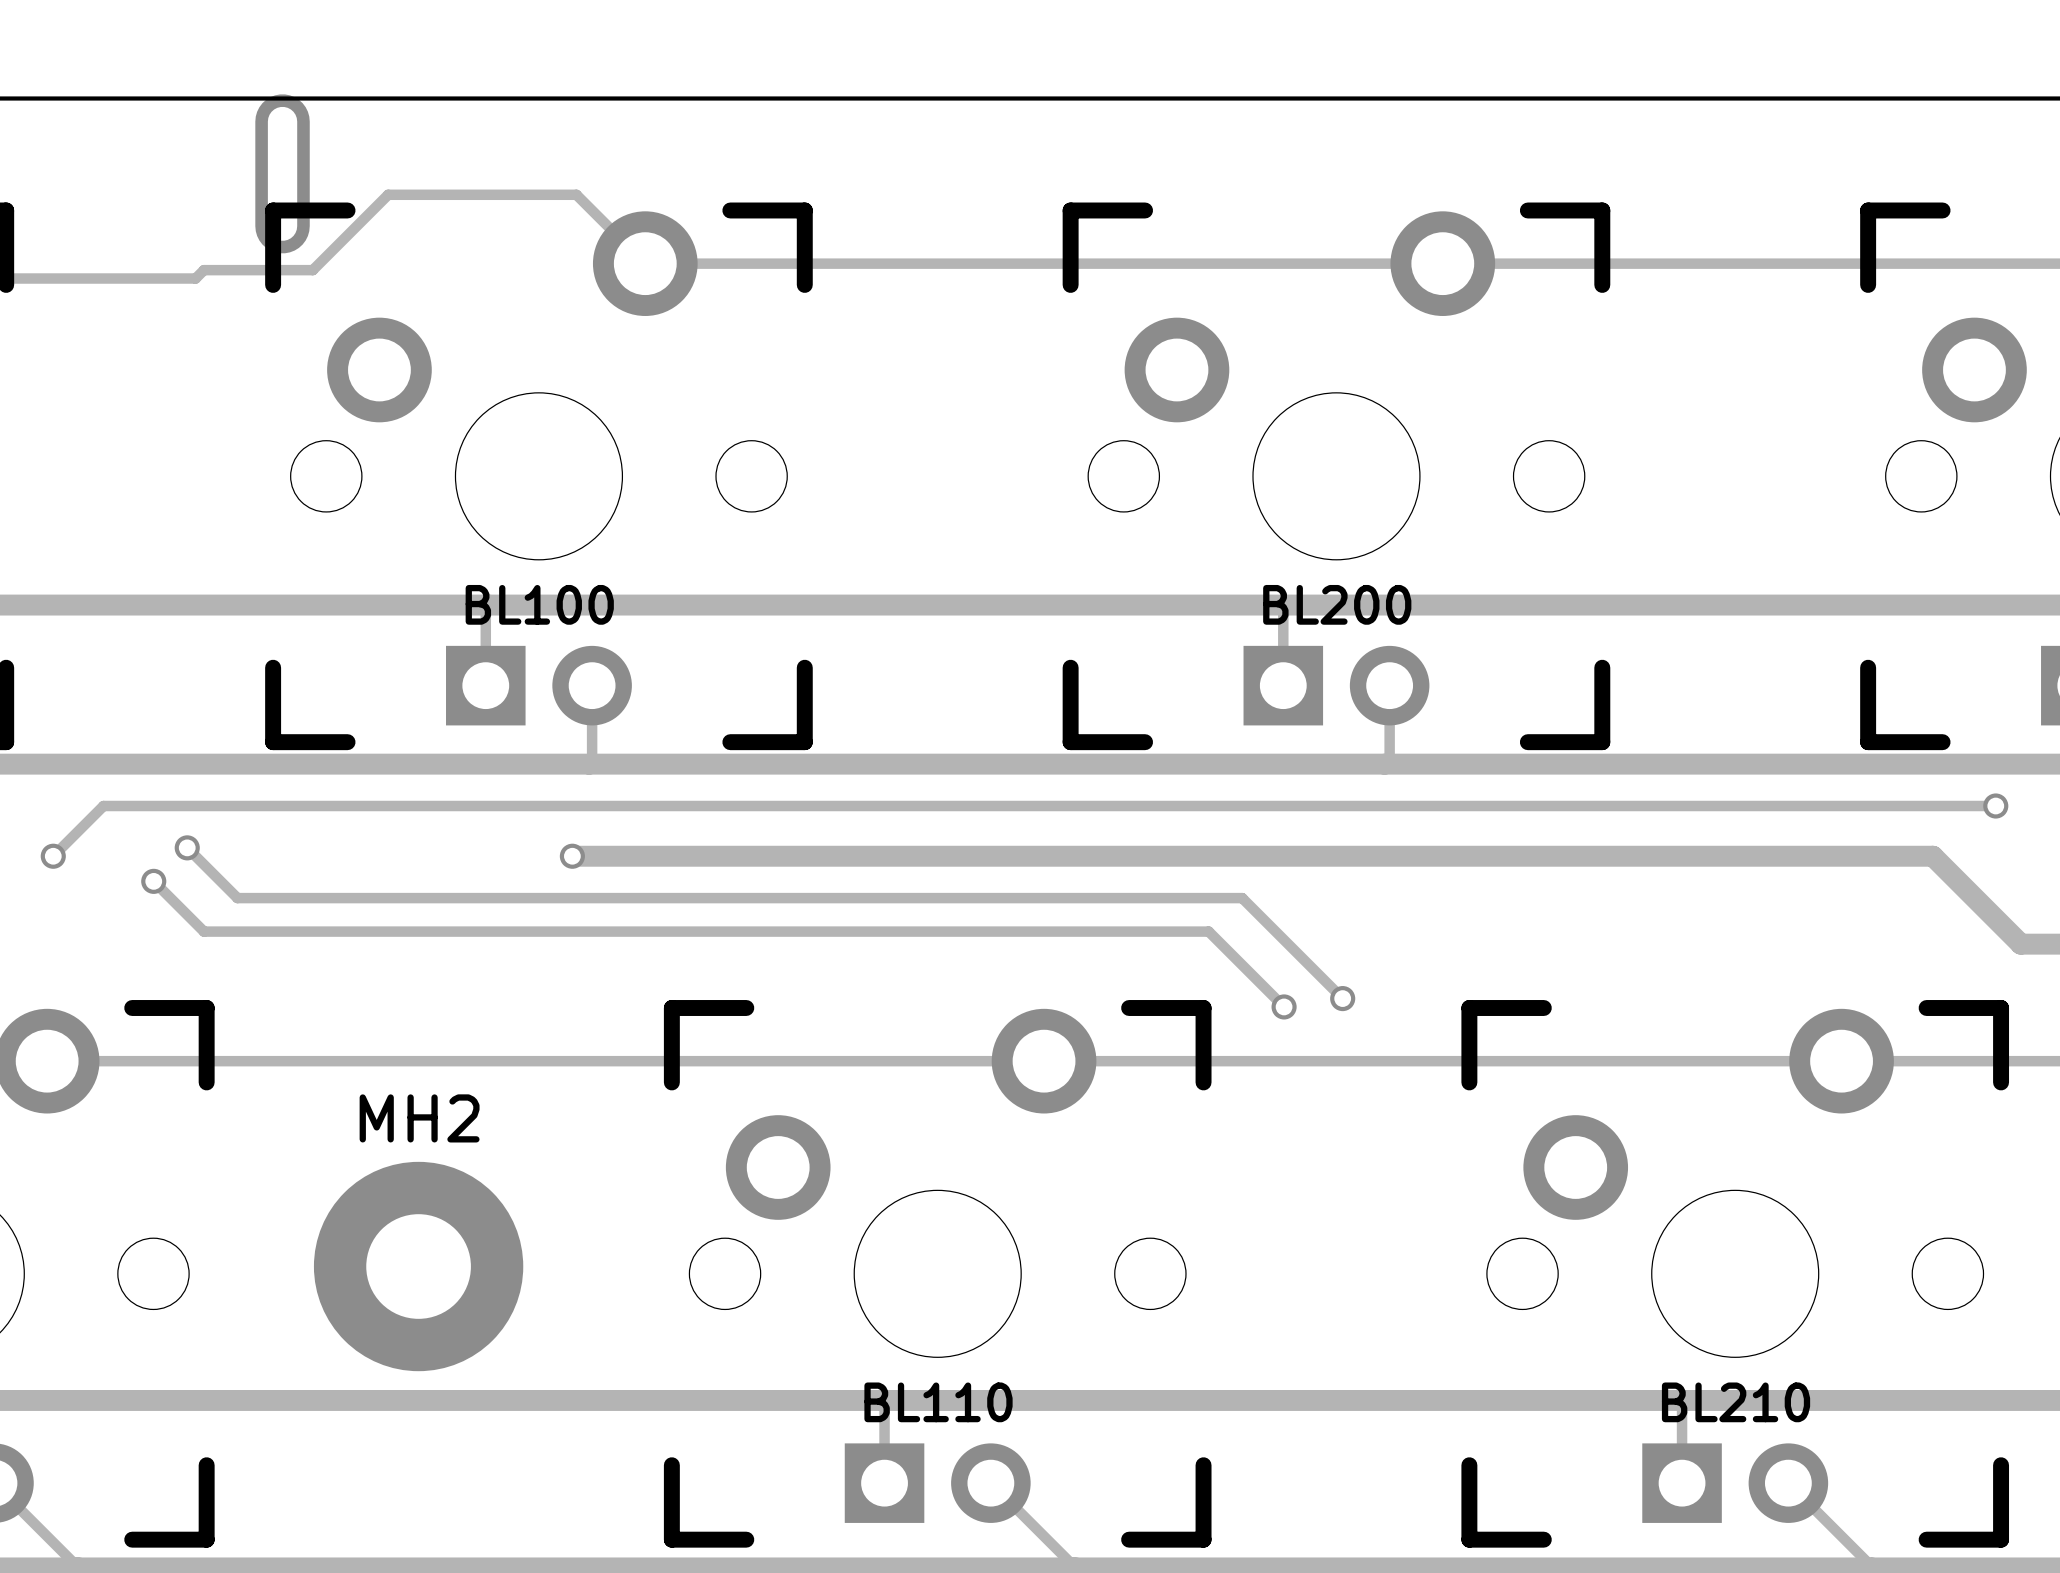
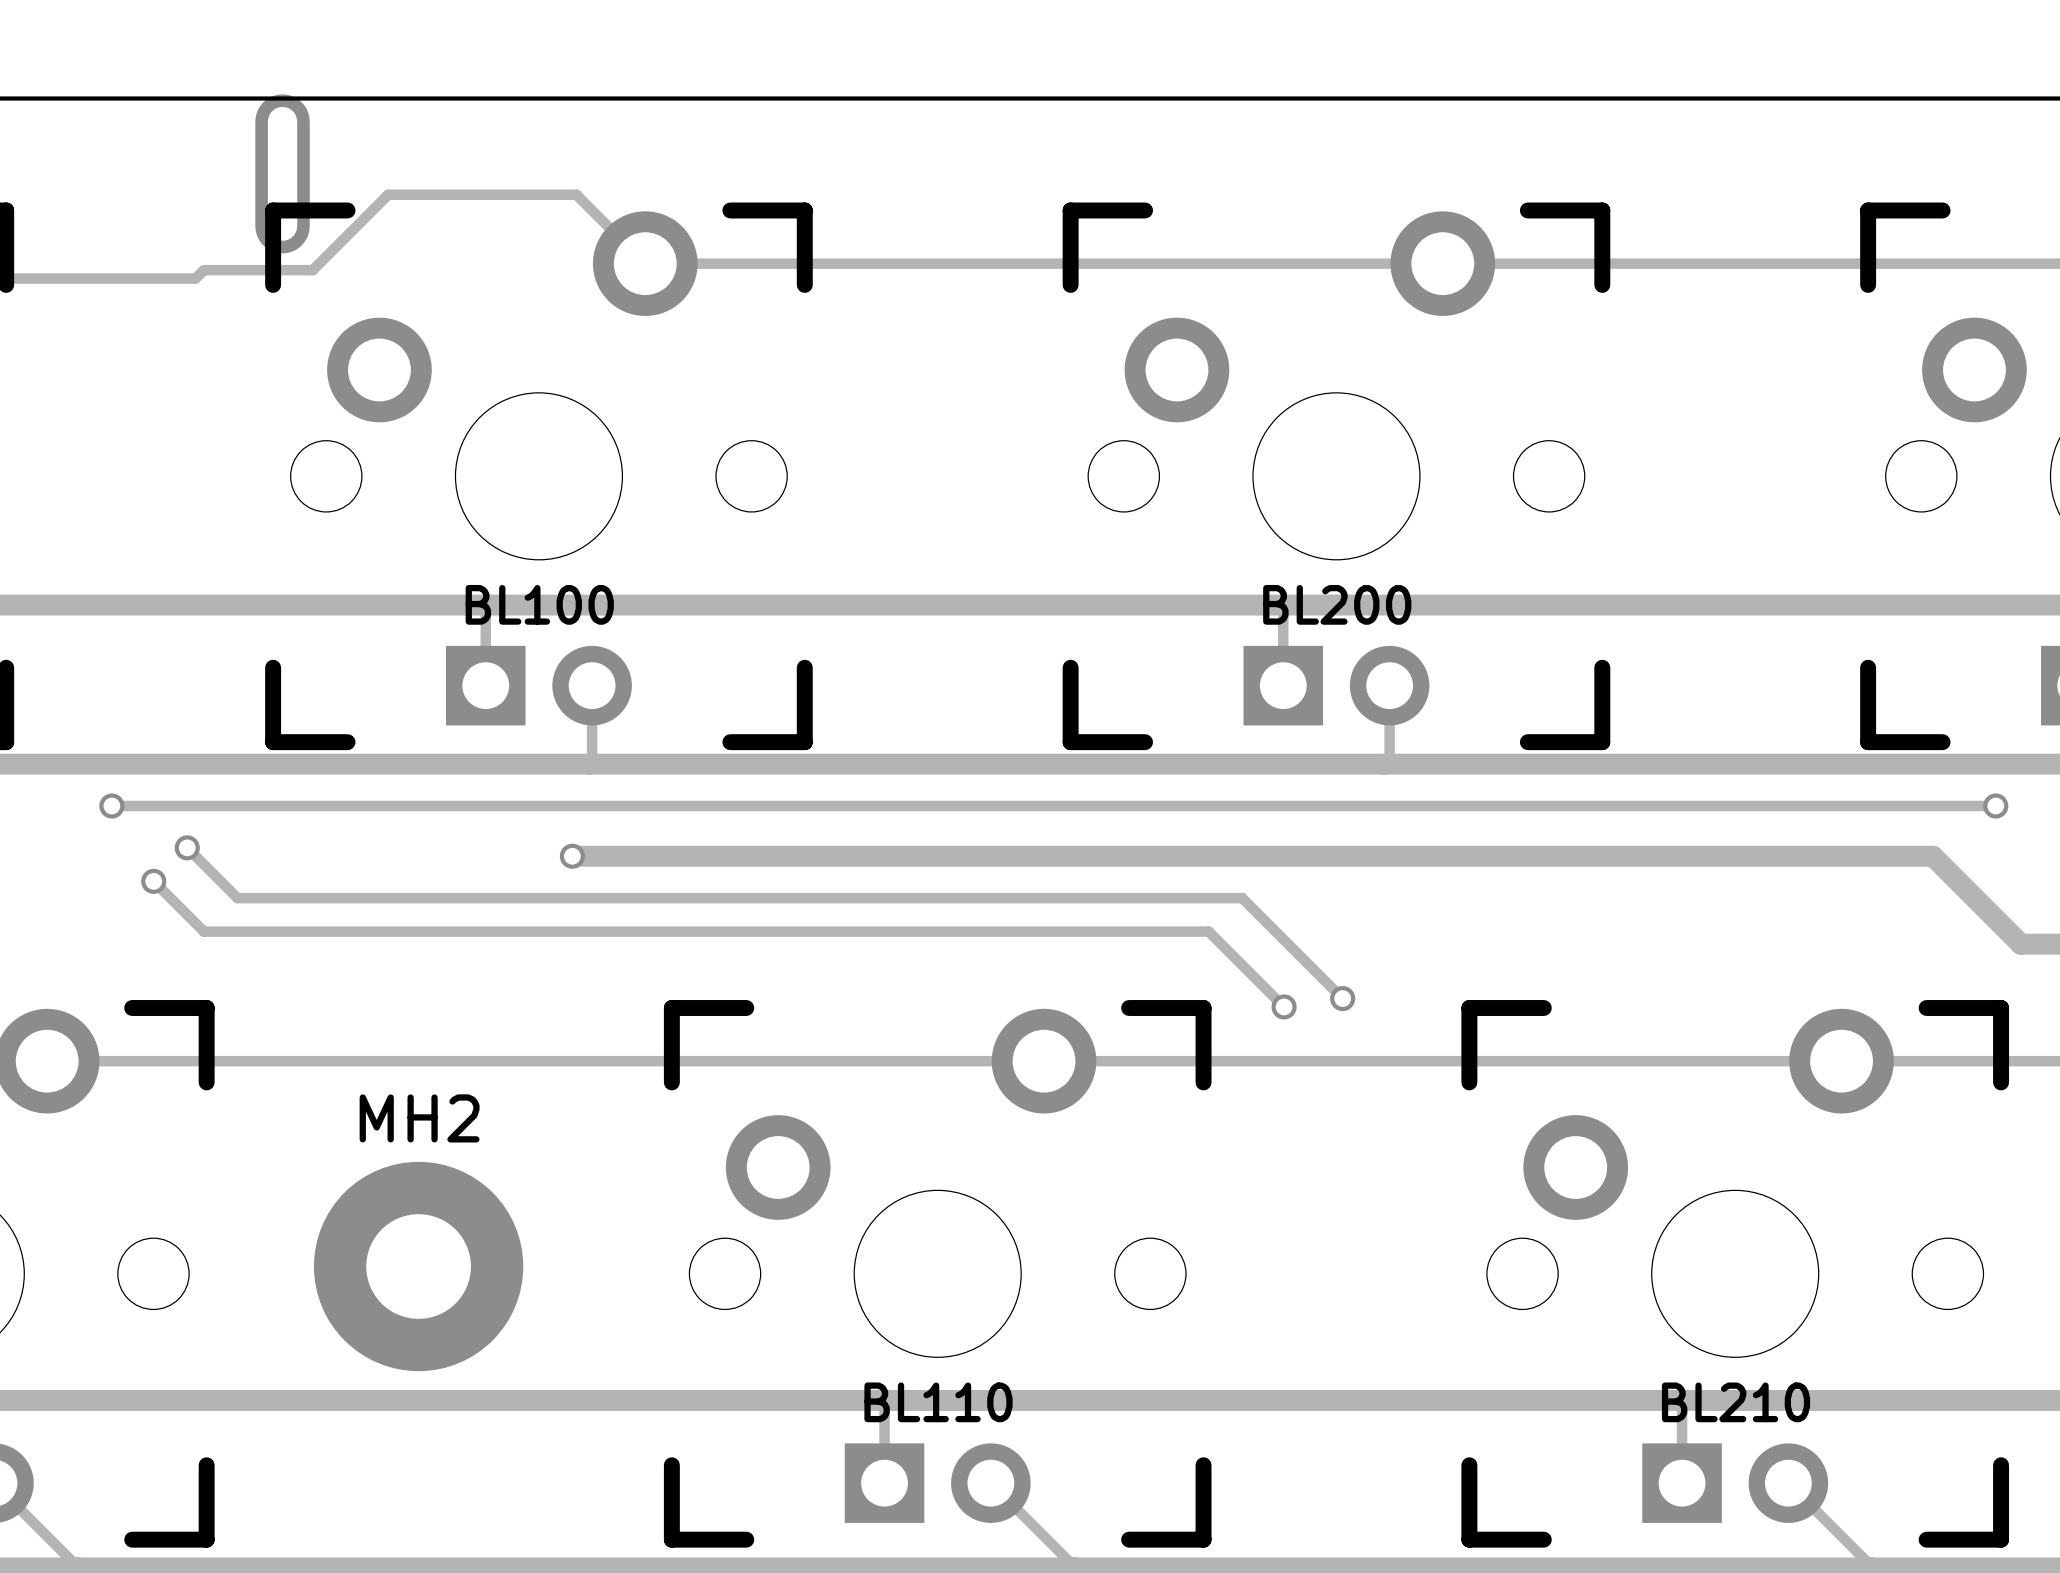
track: (111, 806) (103, 806) (53, 856) -> none
via position: (53, 856) -> (111, 806)

